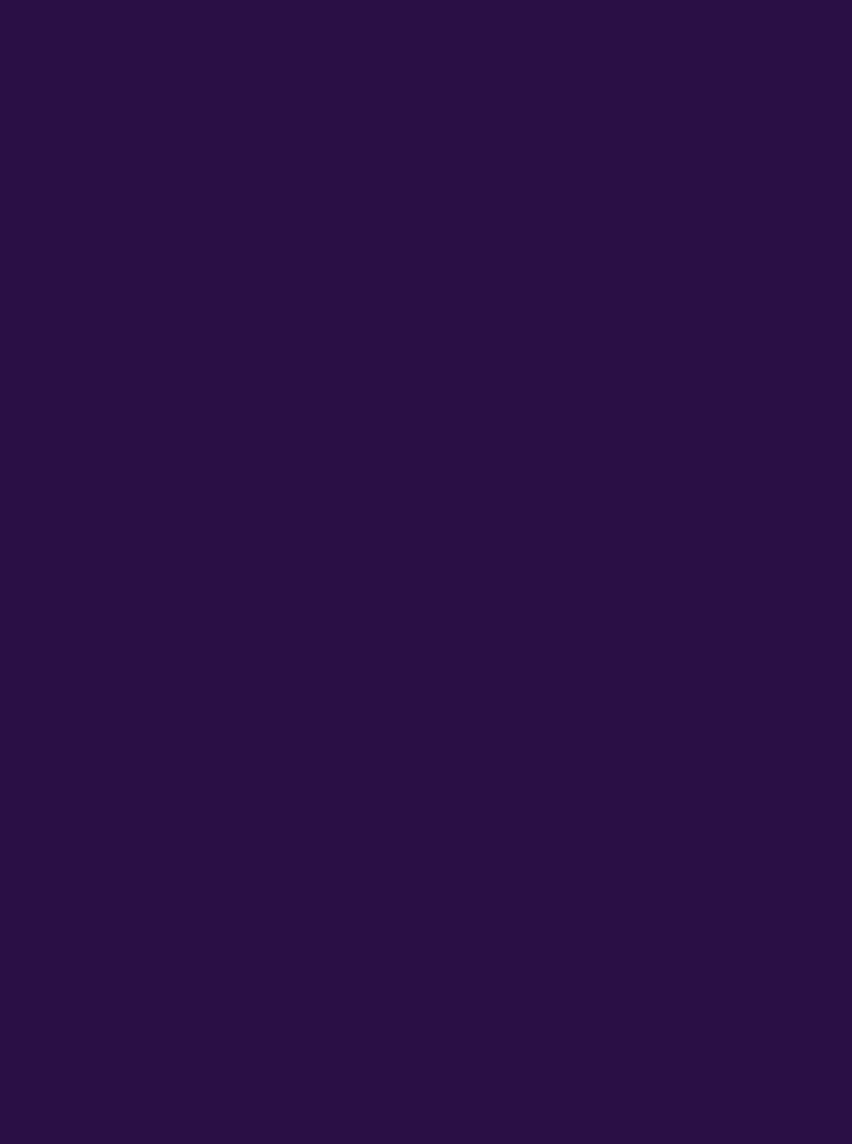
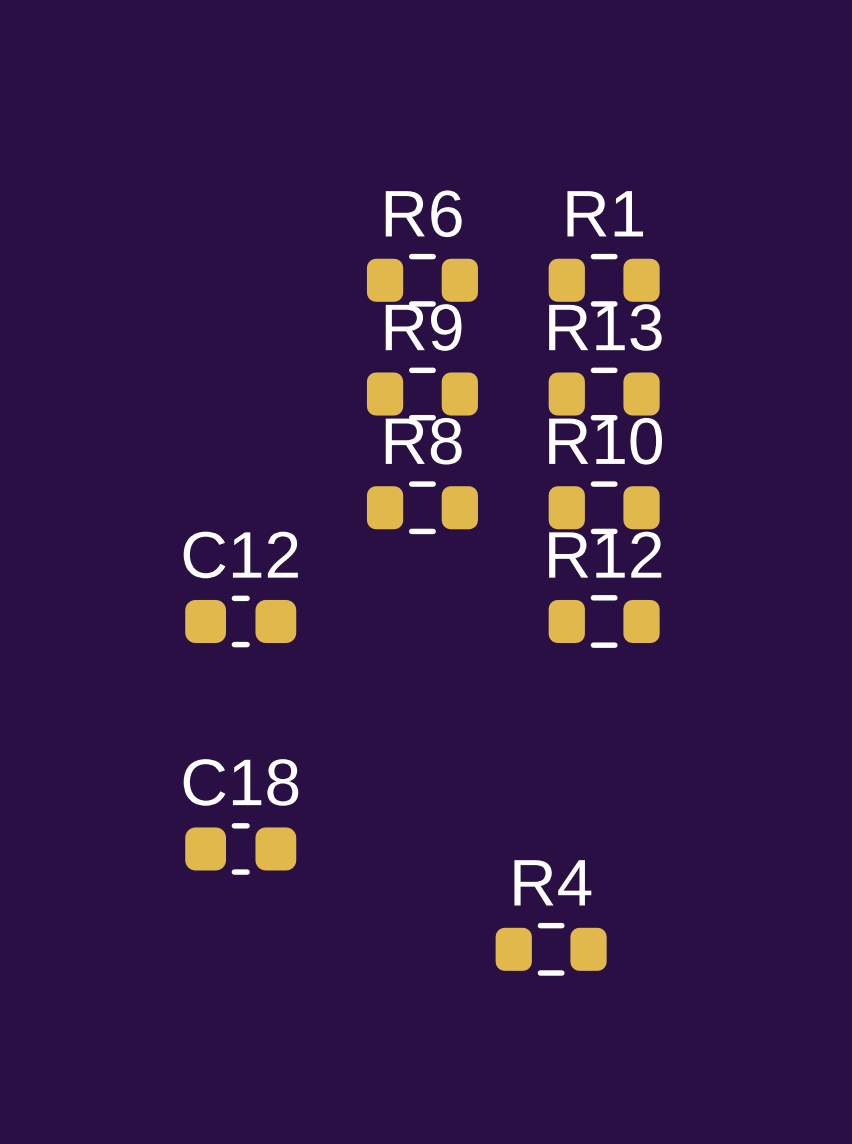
R6: none -> (422, 280)
R1: none -> (604, 280)
R9: none -> (422, 394)
R13: none -> (604, 394)
R8: none -> (422, 507)
R10: none -> (604, 507)
C12: none -> (240, 621)
R12: none -> (604, 621)
C18: none -> (240, 848)
R4: none -> (551, 949)

